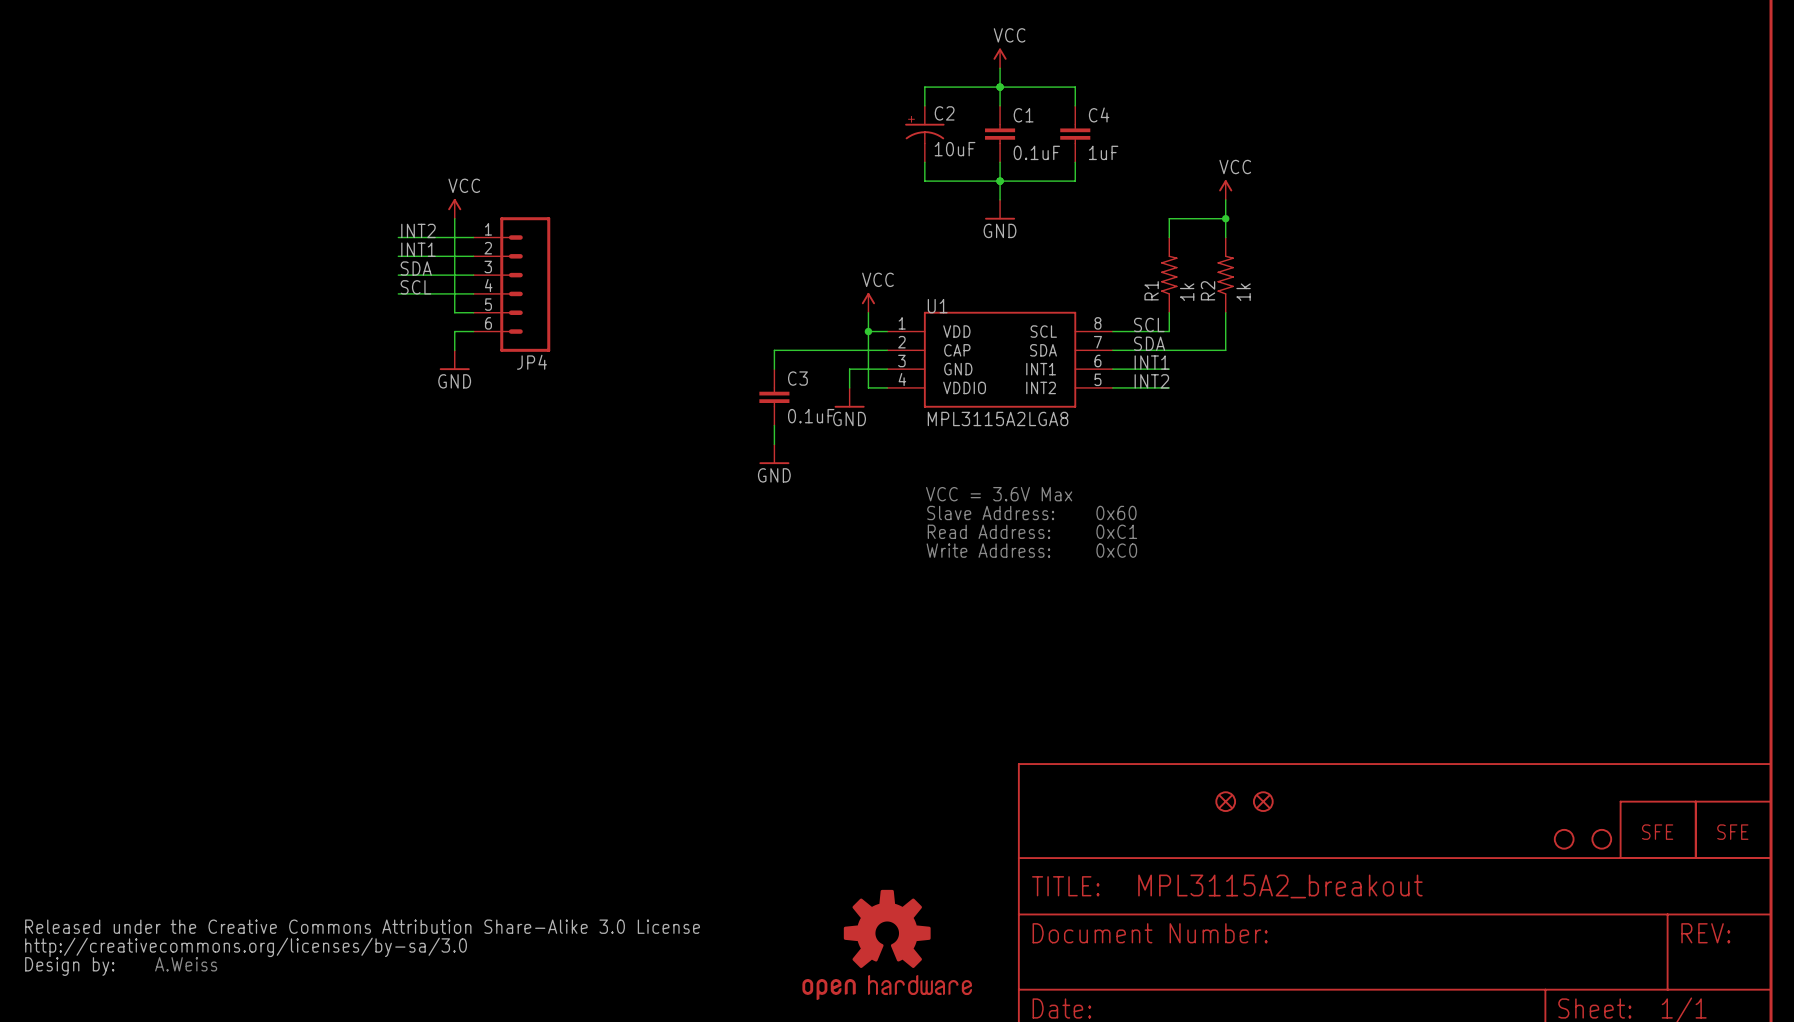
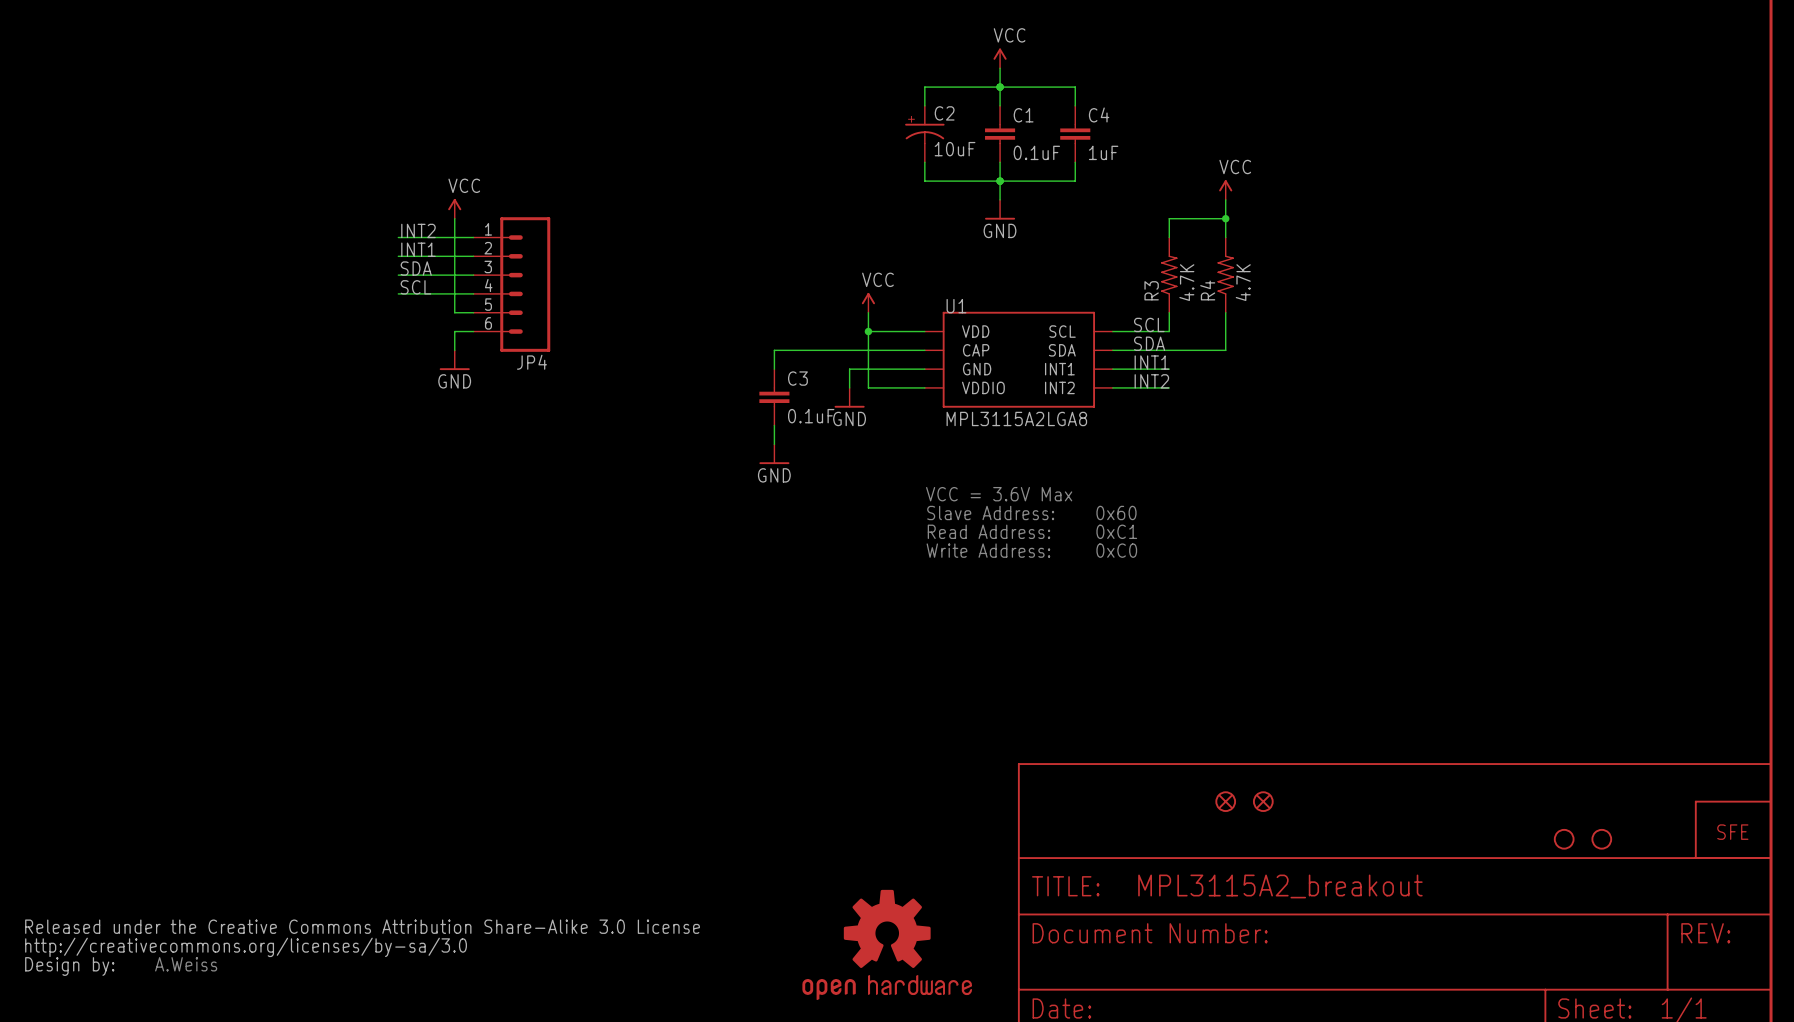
R1 name: R1 (1151, 290) -> R3 (1151, 290)
R2 name: R2 (1208, 290) -> R4 (1207, 290)
R1 value: 1k (1187, 292) -> 4.7K (1186, 282)
R2 value: 1k (1243, 292) -> 4.7K (1243, 282)
U1 symbol: [887, 311, 1113, 408] -> [924, 311, 1113, 408]
part: (1658, 829) -> none

